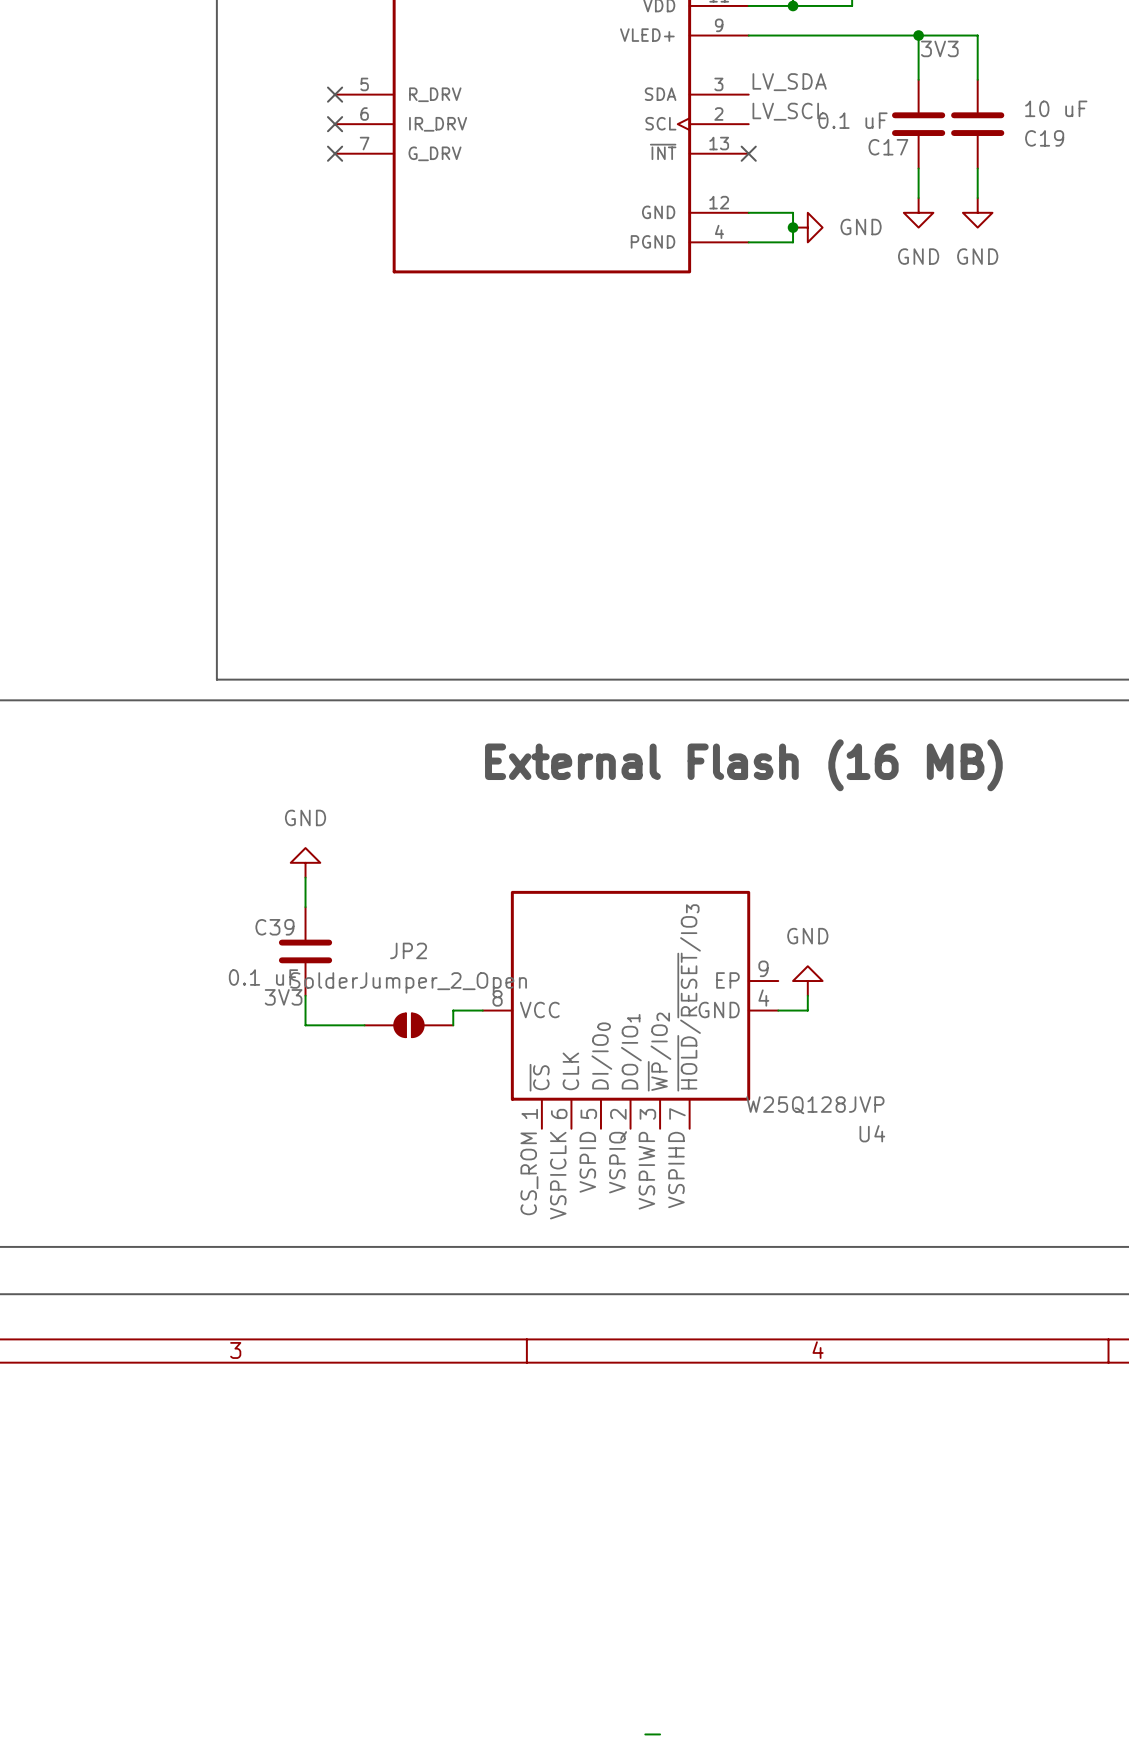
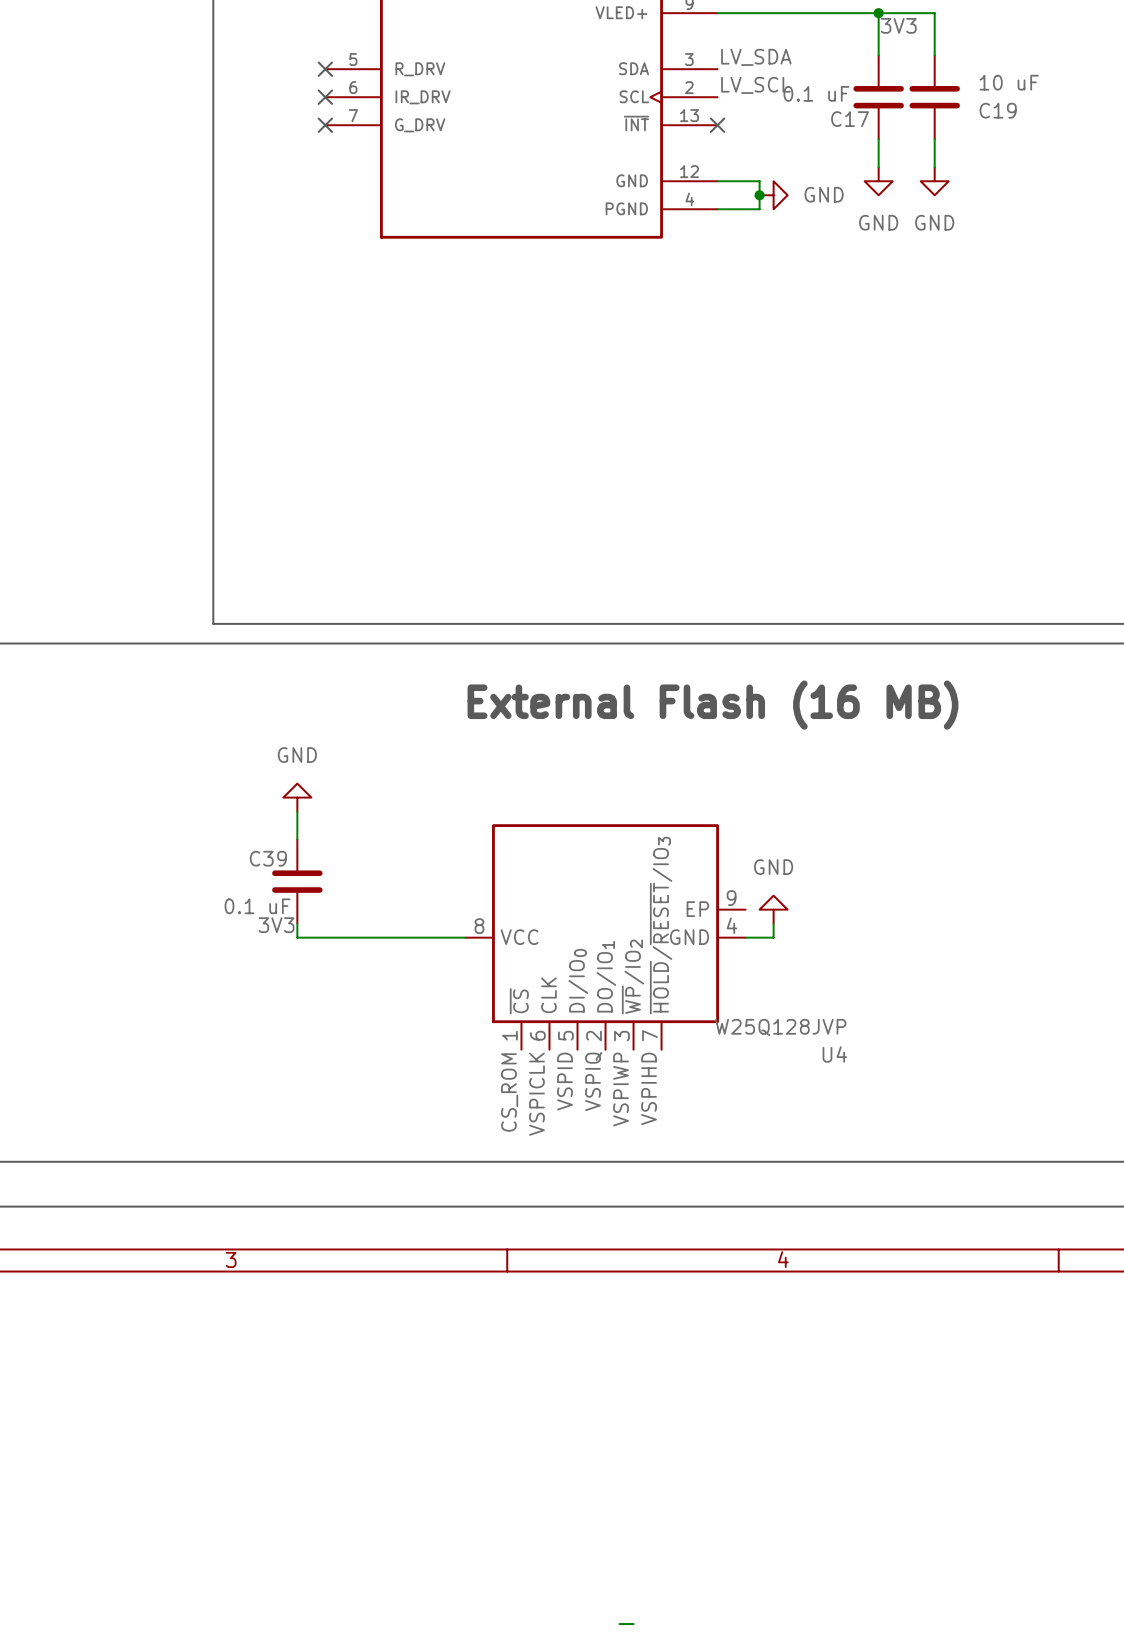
wire: (305, 1010) (305, 1025) (364, 1025) -> (297, 937) (437, 937)
wire: (453, 1010) (453, 1025) -> none
JP2: SolderJumper_2_Open (408, 1025) -> none

